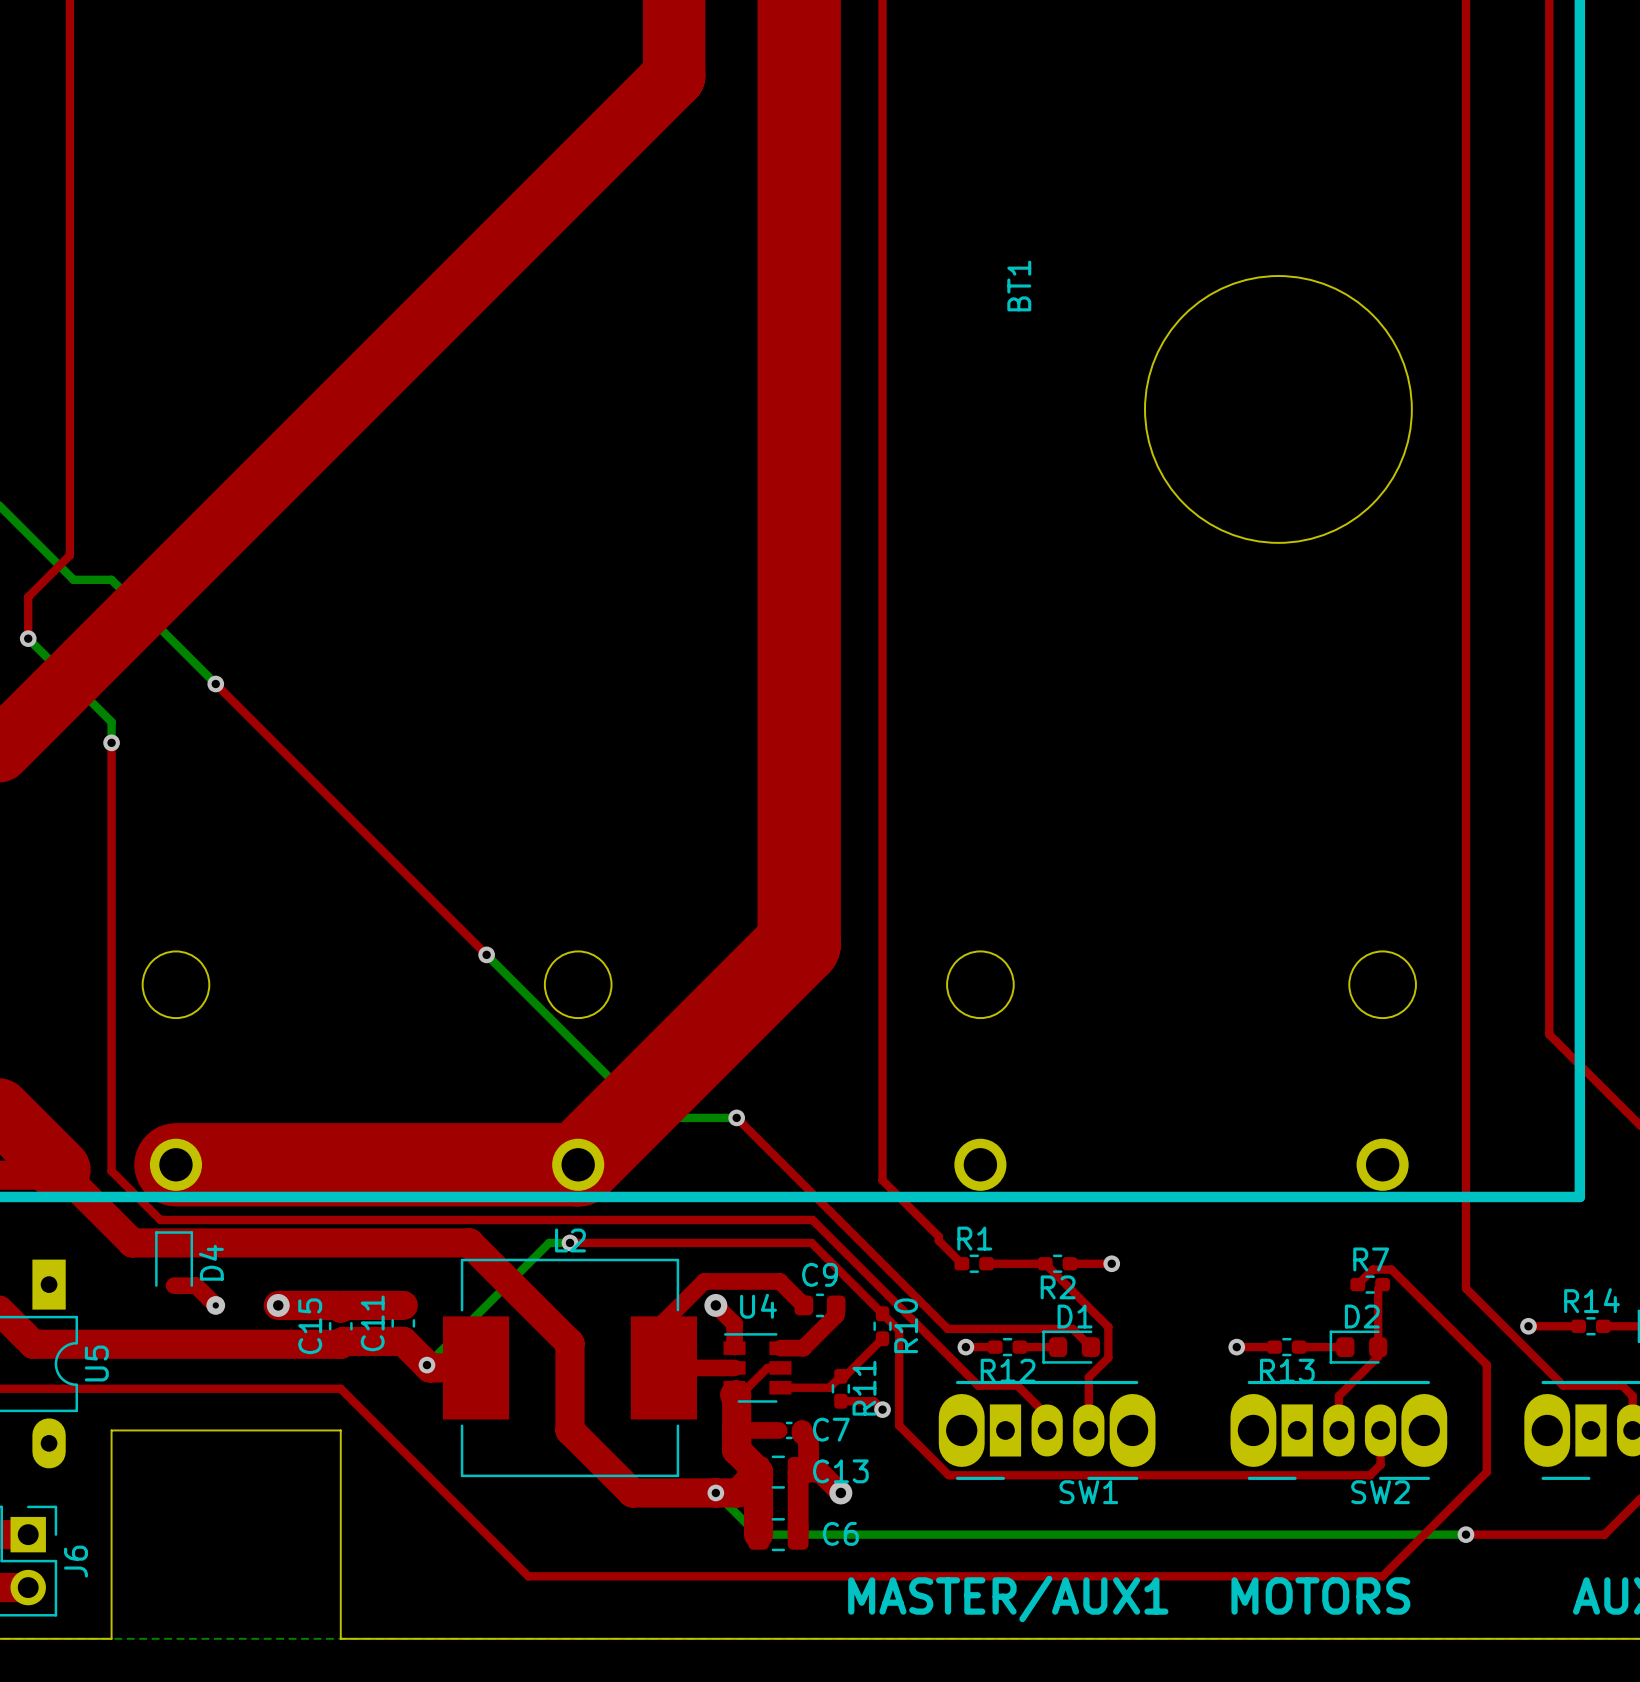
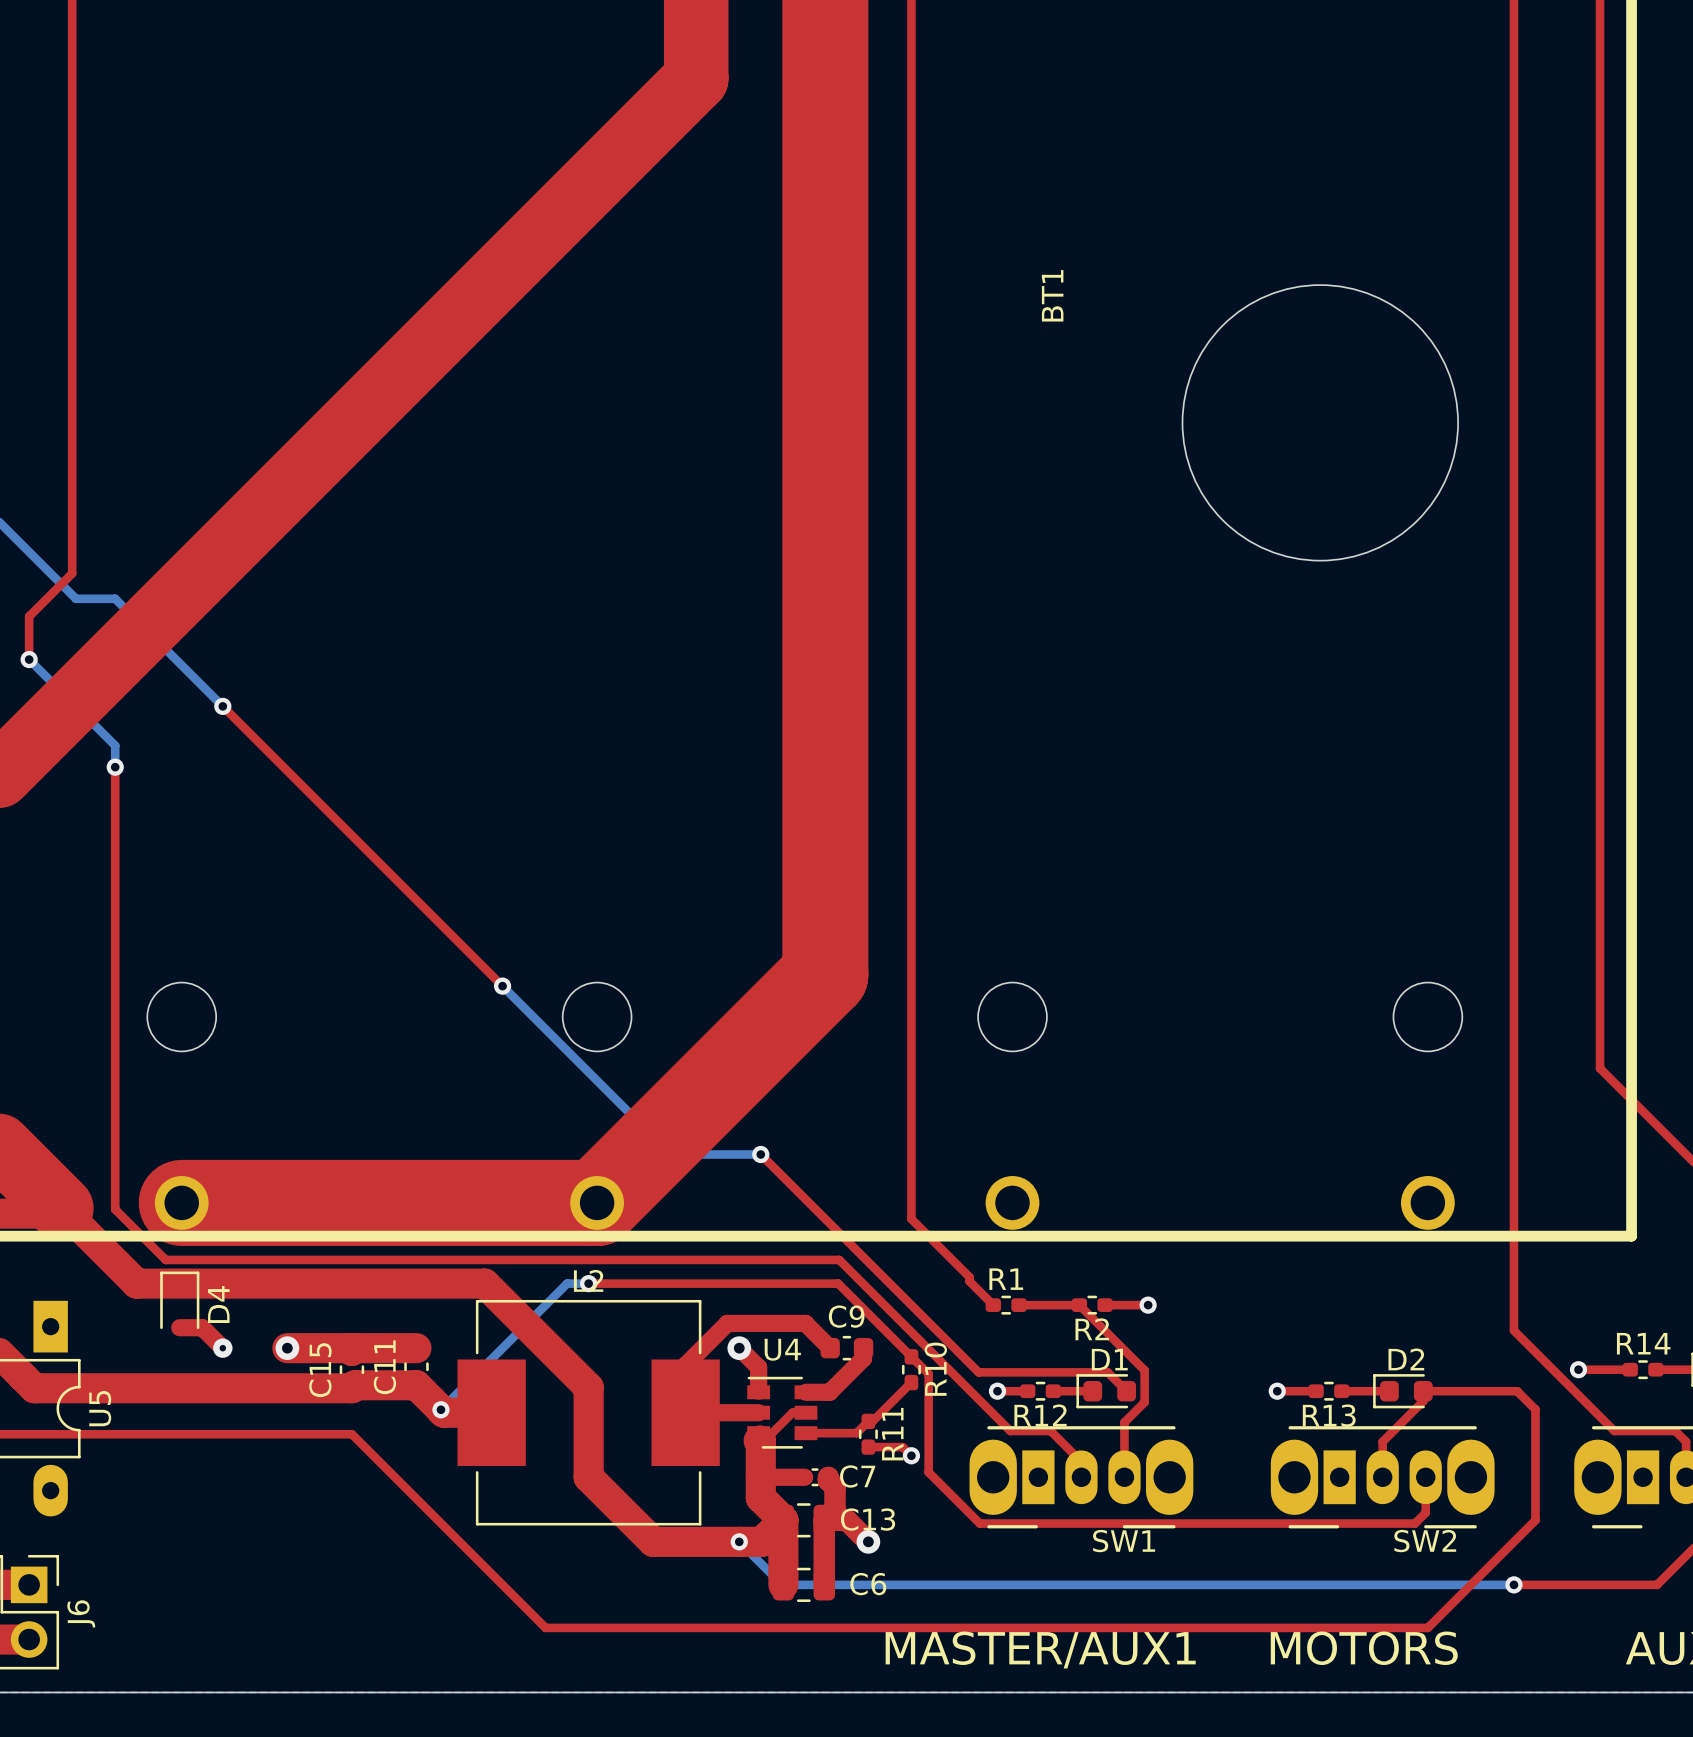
top track: (1357, 1284) (1372, 1269) (1391, 1269) (1469, 1347) -> (1423, 1391) (1517, 1391)
R7: (1370, 1284) -> none
top track: (1382, 1284) (1378, 1289) (1378, 1347) -> none
board edge: (111, 1638) (111, 1430) (340, 1430) (340, 1638) -> (115, 1692) (351, 1692)

